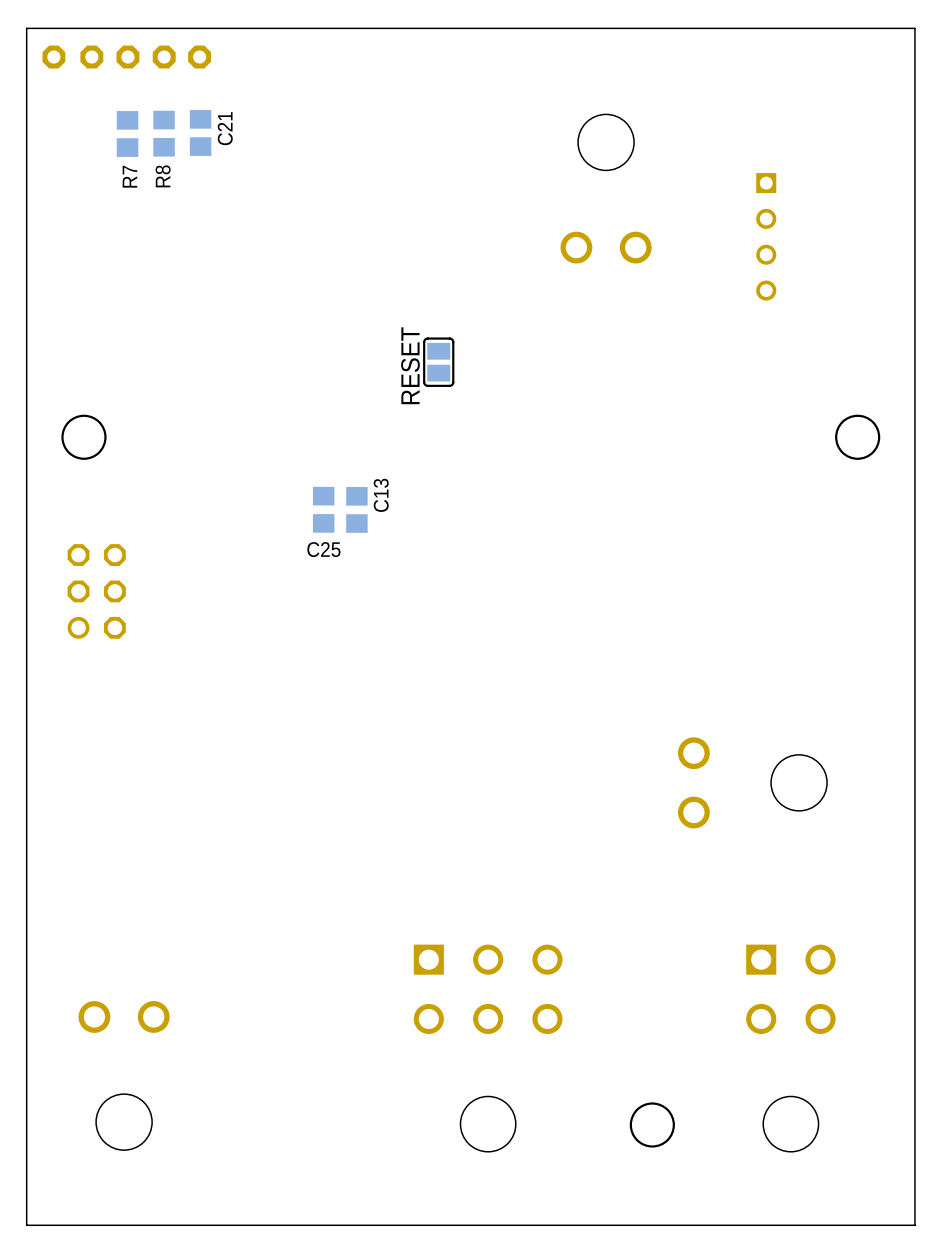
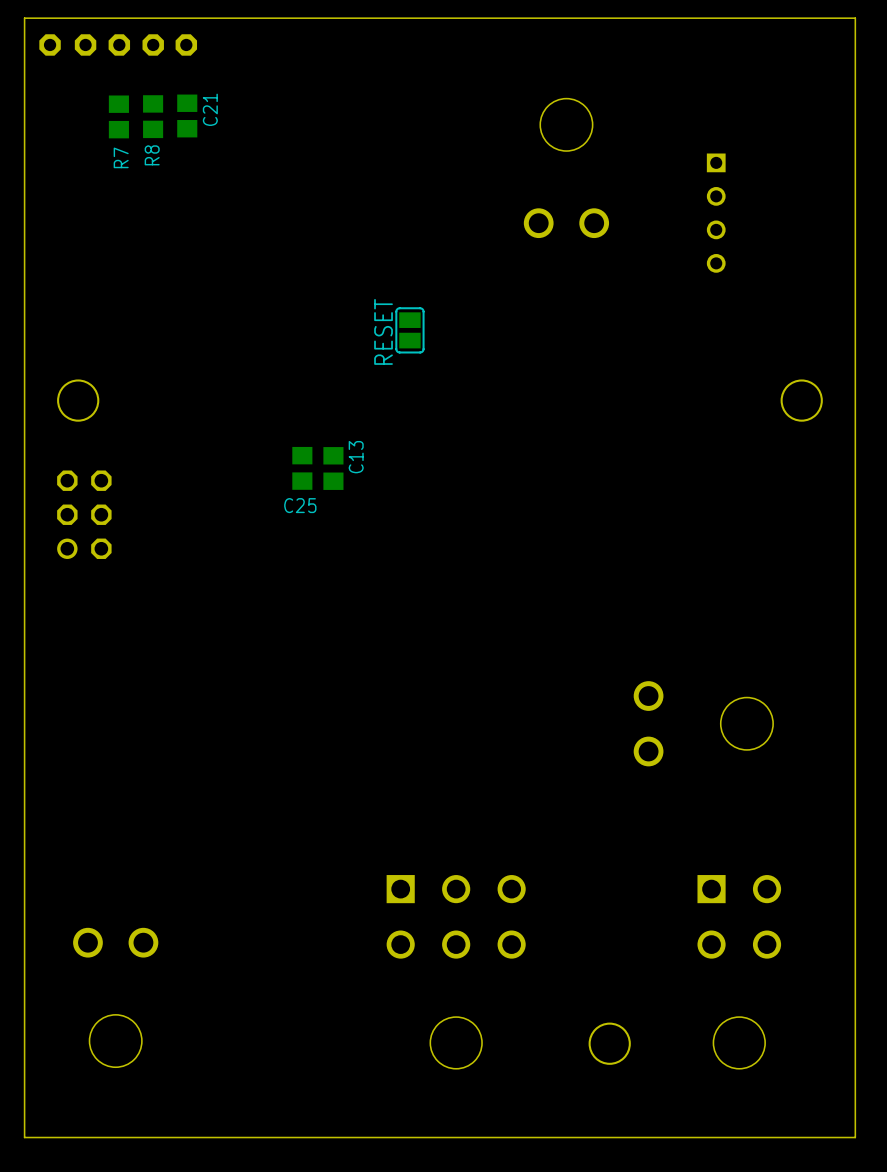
part position: (96, 591) -> (84, 514)

